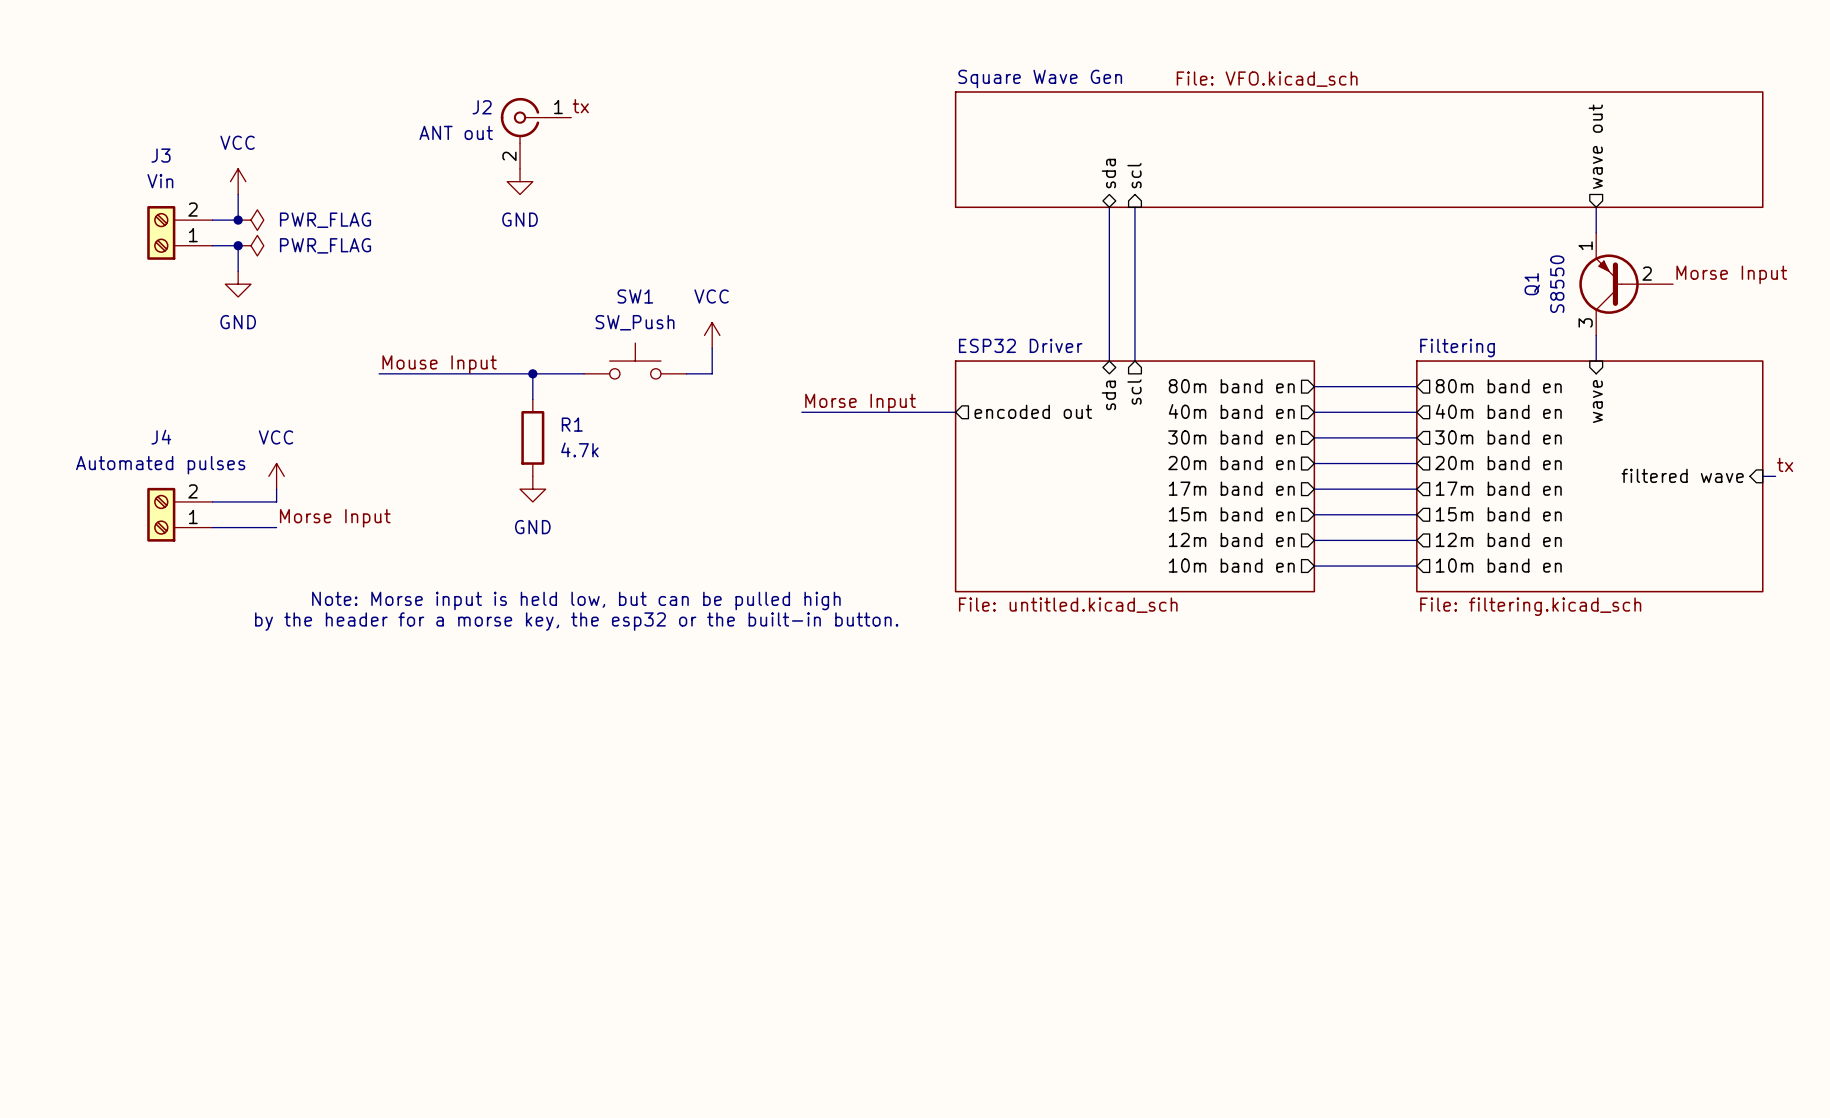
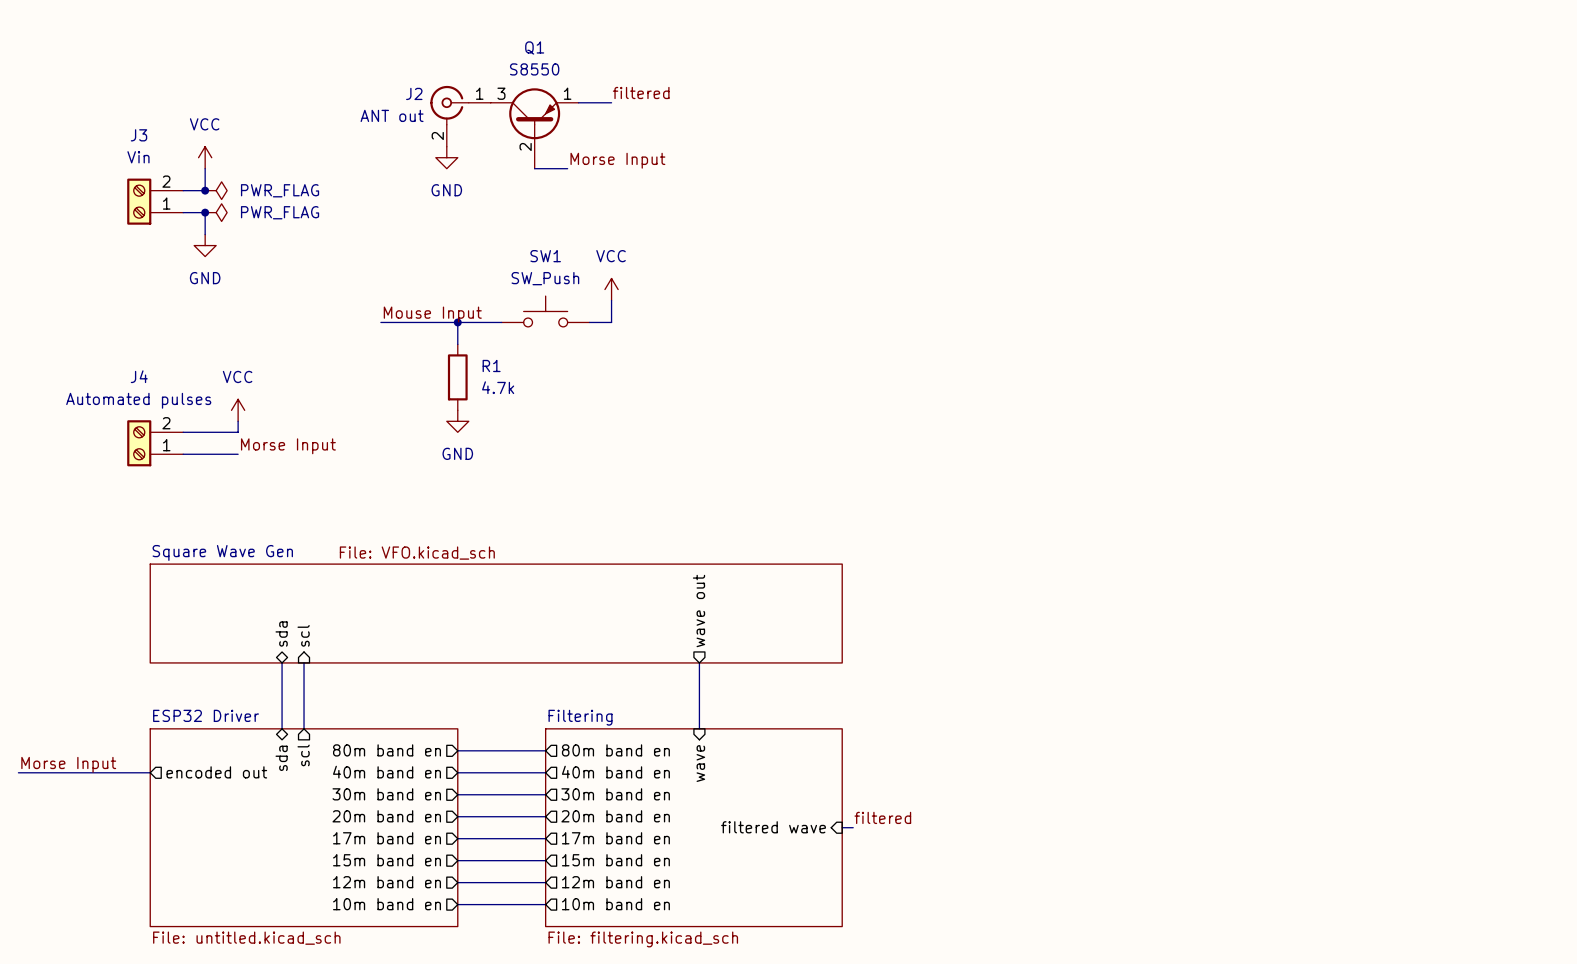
label: tx (580, 106) -> none
label: none -> filtered (641, 92)
wire: none -> (578, 102) (611, 102)
sheet pin: wave out (1595, 146) -> none
sheet Square Wave Gen: File: VFO.kicad_sch (1359, 149) -> none
sheet pin: sda (1108, 173) -> none
sheet pin: scl (1134, 175) -> none
label: none -> Morse Input (617, 160)
wire: none -> (534, 168) (567, 168)
wire: (1109, 207) (1109, 361) -> none
wire: (1134, 207) (1134, 361) -> none
wire: (1596, 207) (1596, 232) -> none
label: Morse Input (1731, 274) -> none
Q1 rotation: 0° (1609, 284) -> 90° clockwise (534, 113)
Q1 position: (1626, 284) -> (534, 128)
wire: (1596, 335) (1596, 361) -> none
label position: Mouse Input (439, 364) -> Mouse Input (432, 314)
wire: (379, 373) (443, 373) -> none
sheet pin: 80m band en (1231, 386) -> none
wire: (1314, 386) (1416, 386) -> none
sheet pin: 80m band en (1498, 386) -> none
sheet pin: scl (1134, 392) -> none
sheet pin: sda (1108, 395) -> none
sheet pin: wave (1597, 401) -> none
label: Morse Input (860, 402) -> none
sheet pin: encoded out (1033, 411) -> none
sheet pin: 40m band en (1231, 411) -> none
sheet pin: 40m band en (1498, 411) -> none
wire: (801, 412) (955, 412) -> none
wire: (1314, 412) (1416, 412) -> none
sheet pin: 30m band en (1231, 437) -> none
wire: (1314, 437) (1416, 437) -> none
sheet pin: 30m band en (1498, 437) -> none
sheet pin: 20m band en (1231, 463) -> none
wire: (1314, 463) (1416, 463) -> none
sheet pin: 20m band en (1498, 463) -> none
label: tx (1785, 464) -> none
sheet pin: filtered wave (1682, 475) -> none
sheet ESP32 Driver position: (1134, 476) -> (304, 827)
sheet Filtering: File: filtering.kicad_sch (1589, 476) -> none
wire: (1762, 476) (1775, 476) -> none
sheet pin: 17m band en (1231, 488) -> none
sheet pin: 17m band en (1498, 488) -> none
wire: (1314, 489) (1416, 489) -> none
sheet pin: 15m band en (1231, 514) -> none
wire: (1314, 514) (1416, 514) -> none
sheet pin: 15m band en (1498, 514) -> none
sheet pin: 12m band en (1231, 539) -> none
sheet pin: 12m band en (1498, 539) -> none
wire: (1314, 540) (1416, 540) -> none
sheet pin: 10m band en (1231, 565) -> none
sheet pin: 10m band en (1498, 565) -> none
wire: (1314, 566) (1416, 566) -> none
text: Note: Morse input is held low, but can be pulled high (576, 600) -> none
text: by the header for a morse key, the esp32 or the built-in button. (576, 621) -> none
sheet pin: none -> wave out (699, 611)
sheet Square Wave Gen: none -> File: VFO.kicad_sch (496, 613)
sheet pin: none -> sda (281, 634)
sheet pin: none -> scl (303, 635)
wire: none -> (282, 662) (282, 728)
wire: none -> (304, 662) (304, 728)
wire: none -> (699, 662) (699, 728)
sheet pin: none -> 80m band en (387, 750)
wire: none -> (457, 750) (545, 750)
sheet pin: none -> 80m band en (615, 750)
sheet pin: none -> scl (303, 755)
sheet pin: none -> sda (281, 758)
sheet pin: none -> wave (700, 763)
label: none -> Morse Input (68, 764)
sheet pin: none -> encoded out (216, 772)
sheet pin: none -> 40m band en (387, 772)
sheet pin: none -> 40m band en (615, 772)
wire: none -> (18, 772) (150, 772)
wire: none -> (457, 772) (545, 772)
sheet pin: none -> 30m band en (386, 794)
wire: none -> (457, 794) (545, 794)
sheet pin: none -> 30m band en (615, 794)
sheet pin: none -> 20m band en (386, 816)
sheet pin: none -> 20m band en (615, 816)
wire: none -> (457, 816) (545, 816)
label: none -> filtered (882, 817)
sheet pin: none -> filtered wave (773, 827)
sheet Filtering: none -> File: filtering.kicad_sch (693, 827)
wire: none -> (842, 827) (853, 827)
sheet pin: none -> 17m band en (387, 838)
sheet pin: none -> 17m band en (615, 838)
wire: none -> (457, 838) (545, 838)
sheet pin: none -> 15m band en (387, 860)
wire: none -> (457, 860) (545, 860)
sheet pin: none -> 15m band en (615, 860)
sheet pin: none -> 12m band en (387, 882)
sheet pin: none -> 12m band en (615, 882)
wire: none -> (457, 882) (545, 882)
sheet pin: none -> 10m band en (387, 904)
wire: none -> (457, 904) (545, 904)
sheet pin: none -> 10m band en (615, 904)

